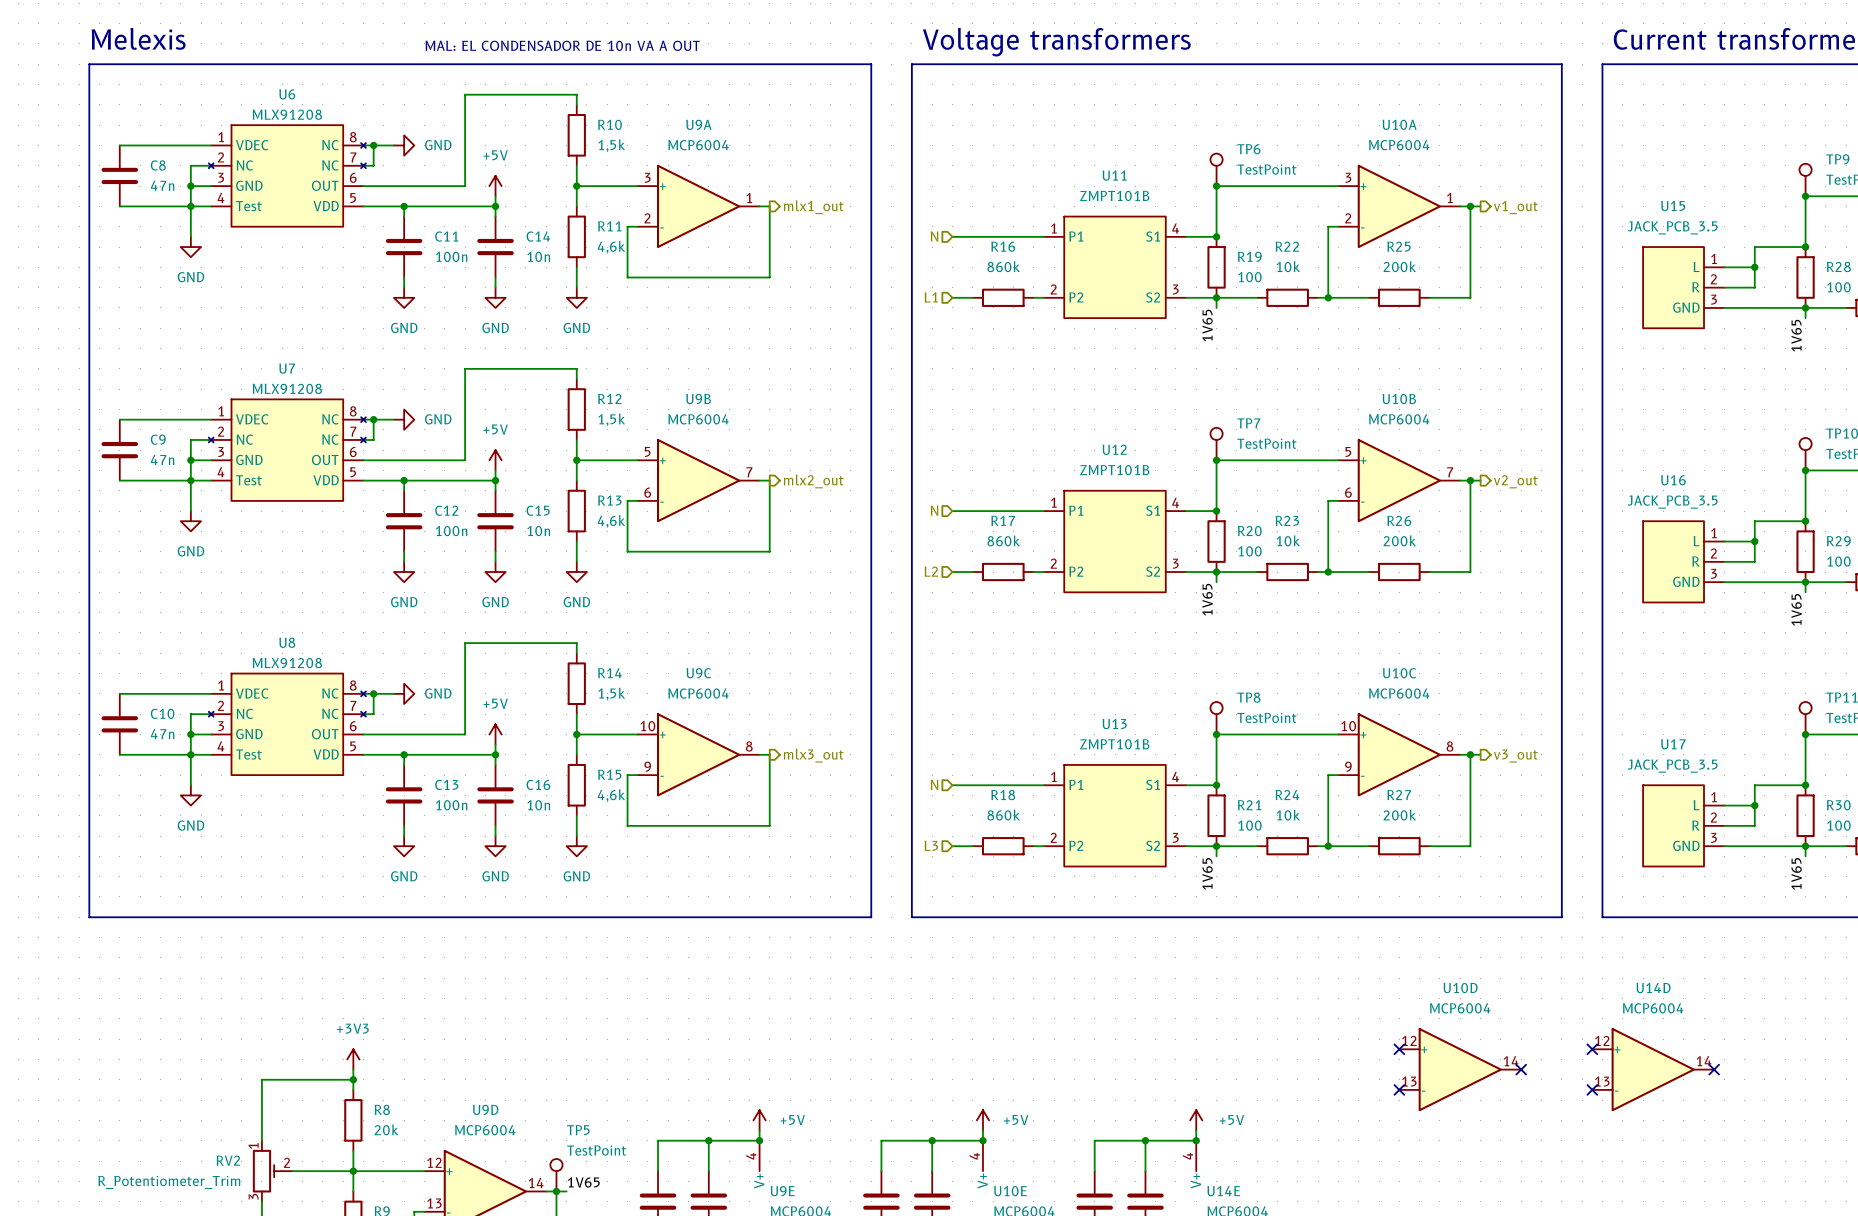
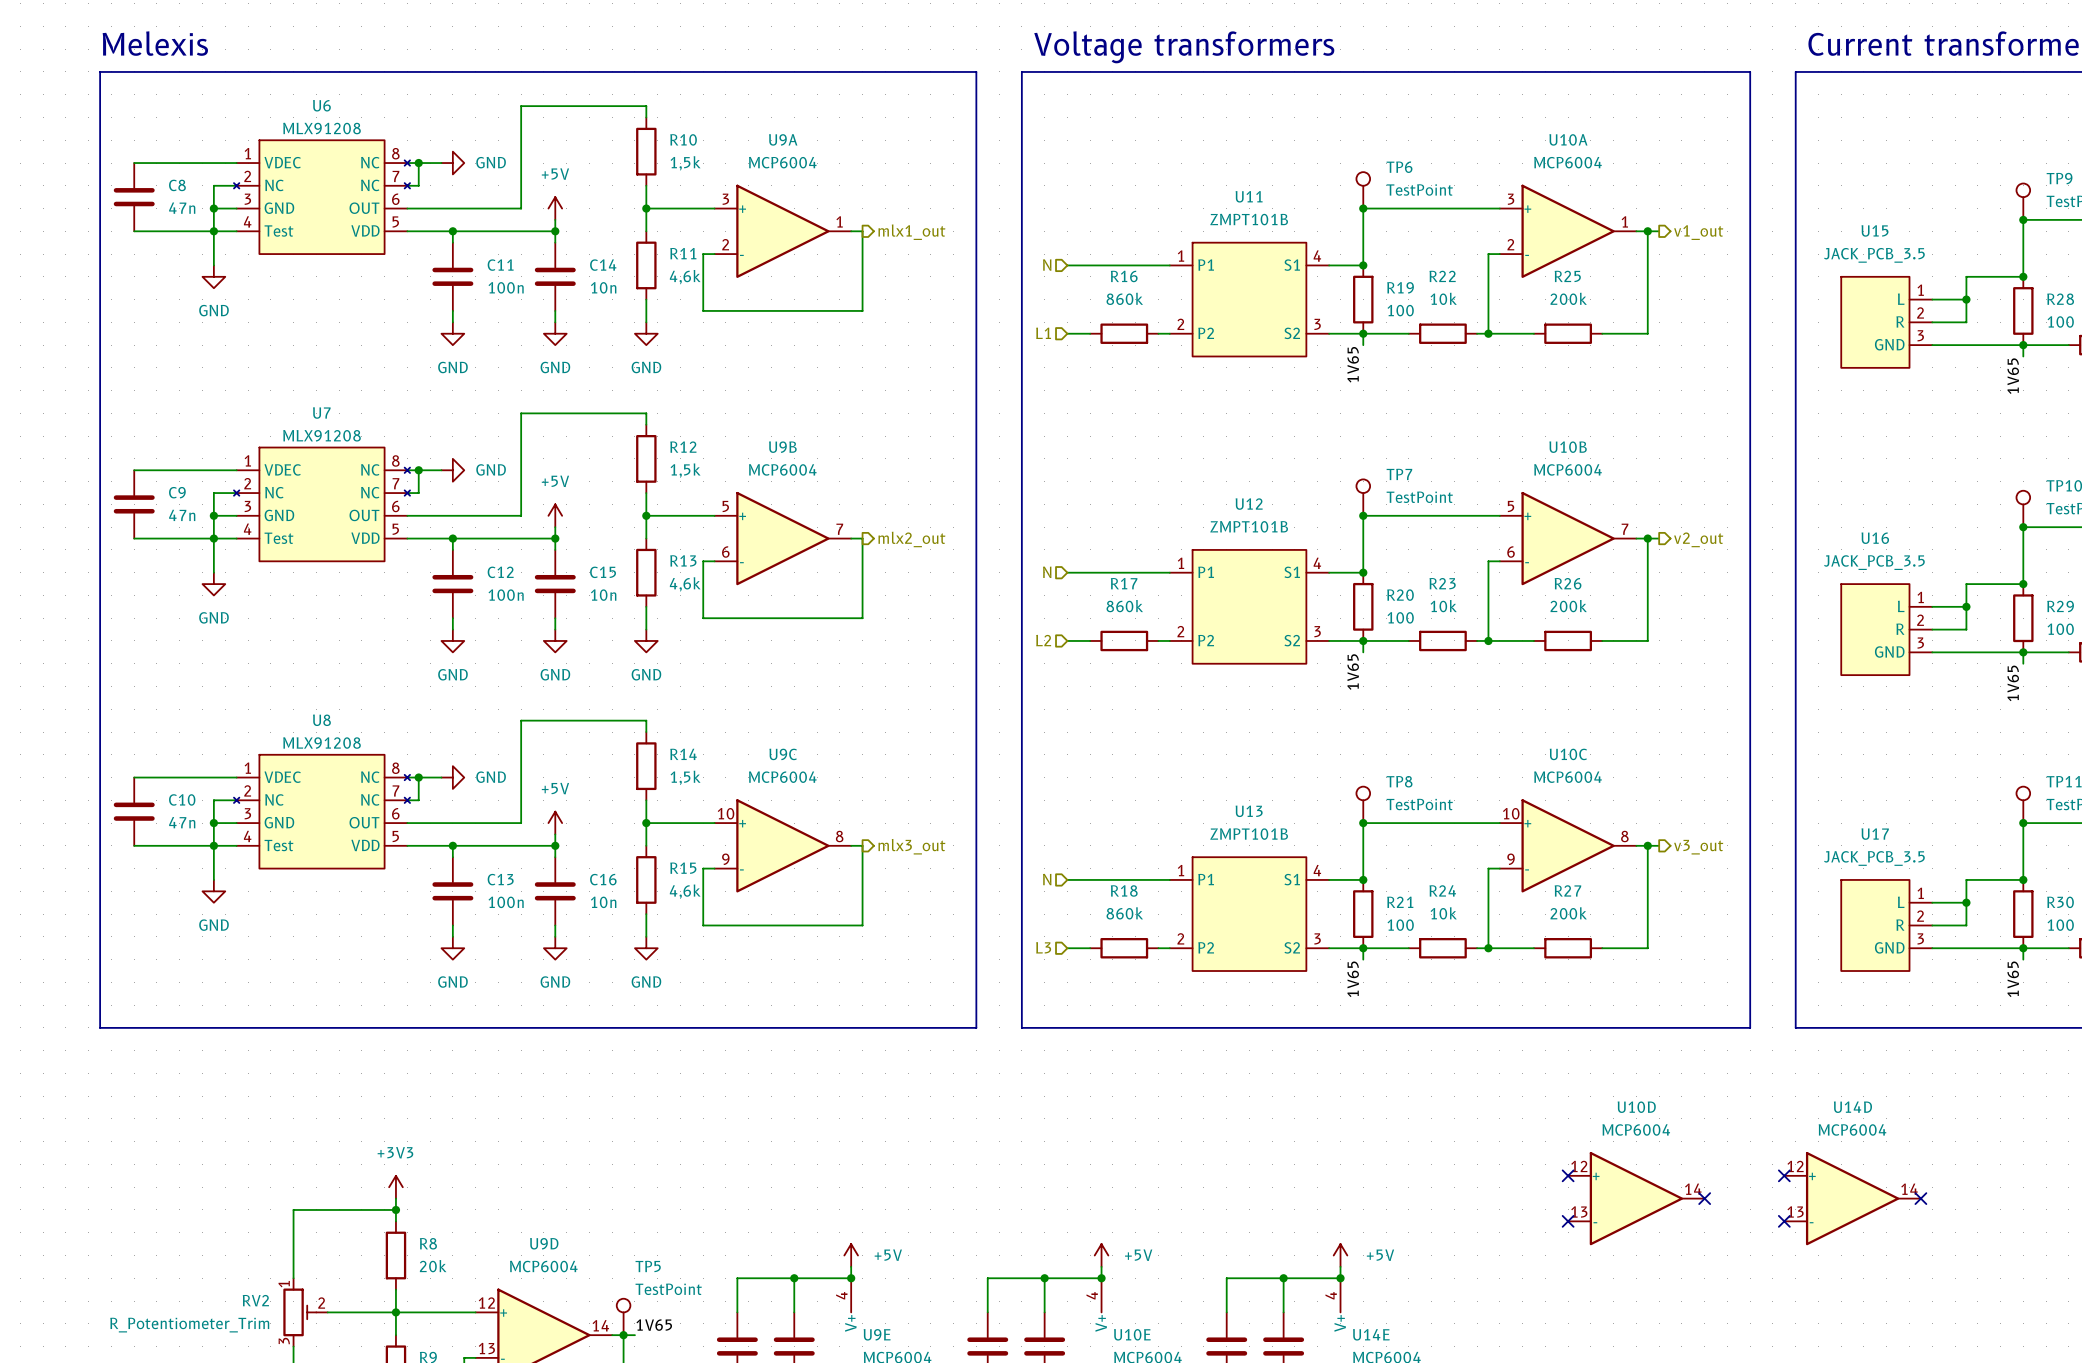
text: MAL: EL CONDENSADOR DE 10n VA A OUT (562, 45) -> none

